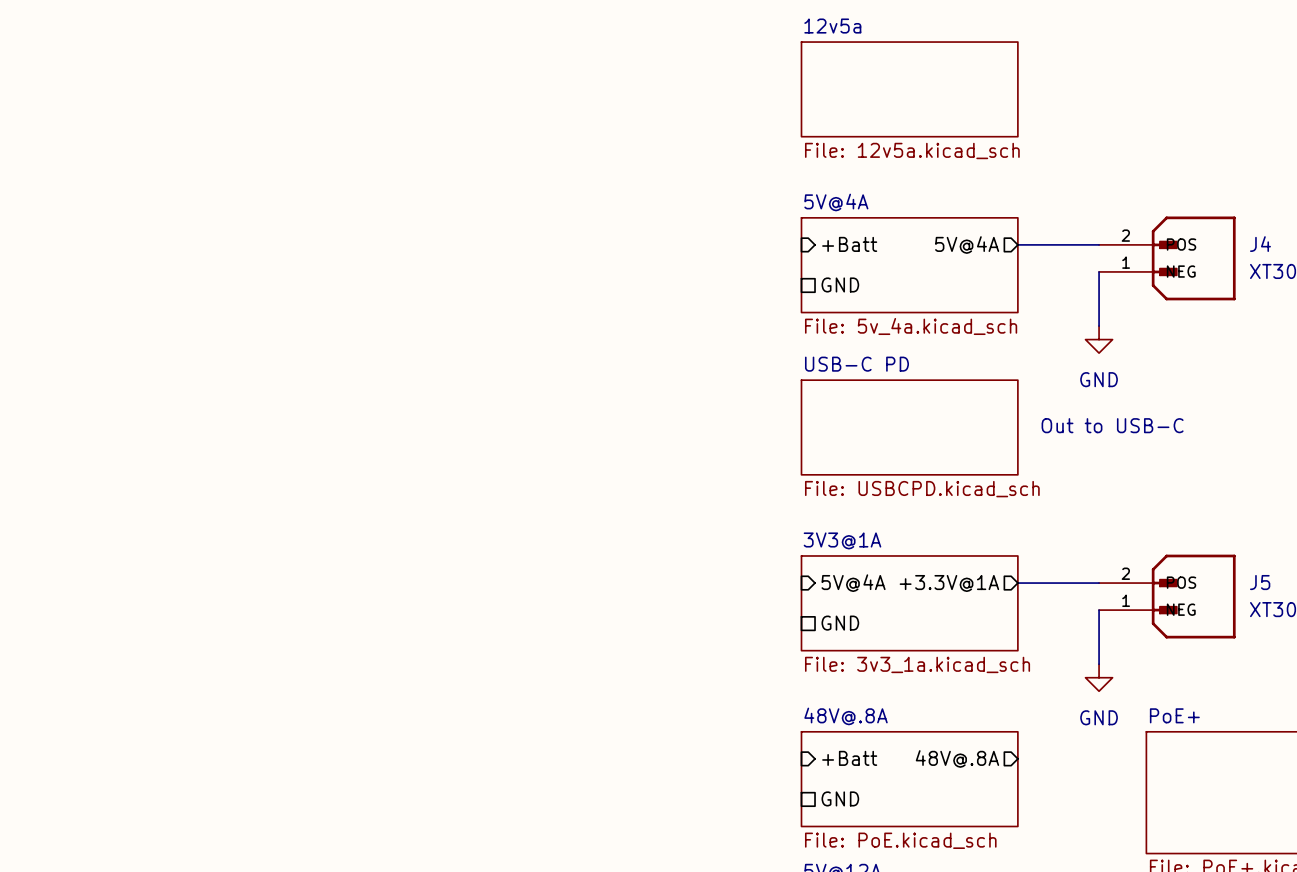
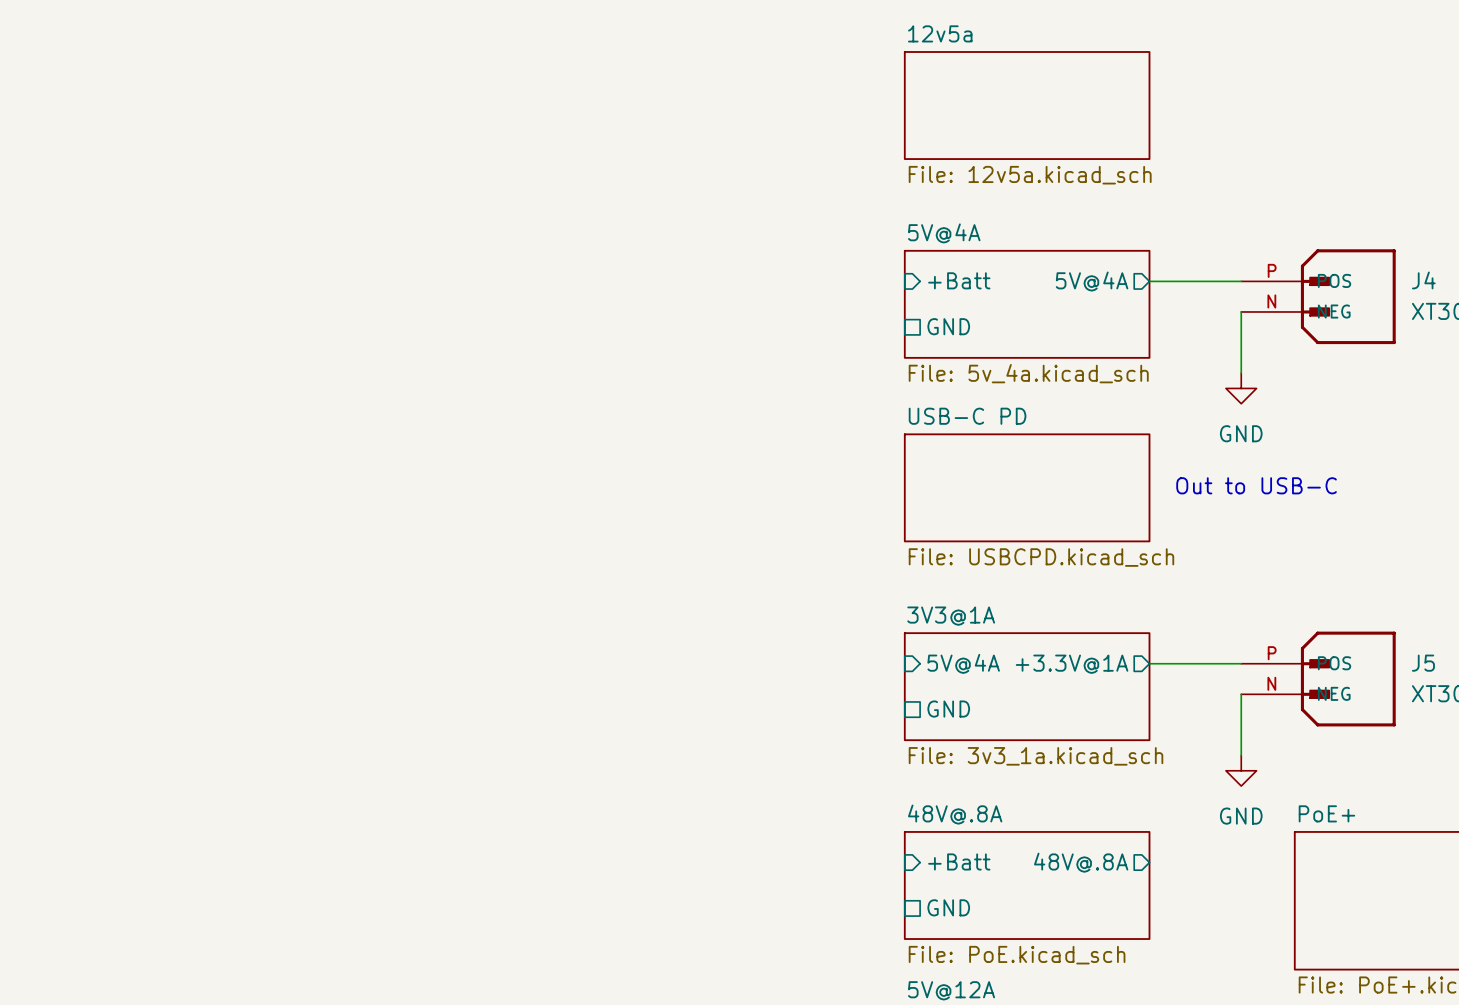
J4 pin number: 2 (1125, 235) -> P (1272, 270)
J4 pin number: 1 (1126, 262) -> N (1271, 301)
J5 pin number: 2 (1125, 573) -> P (1272, 653)
J5 pin number: 1 (1126, 600) -> N (1271, 683)

